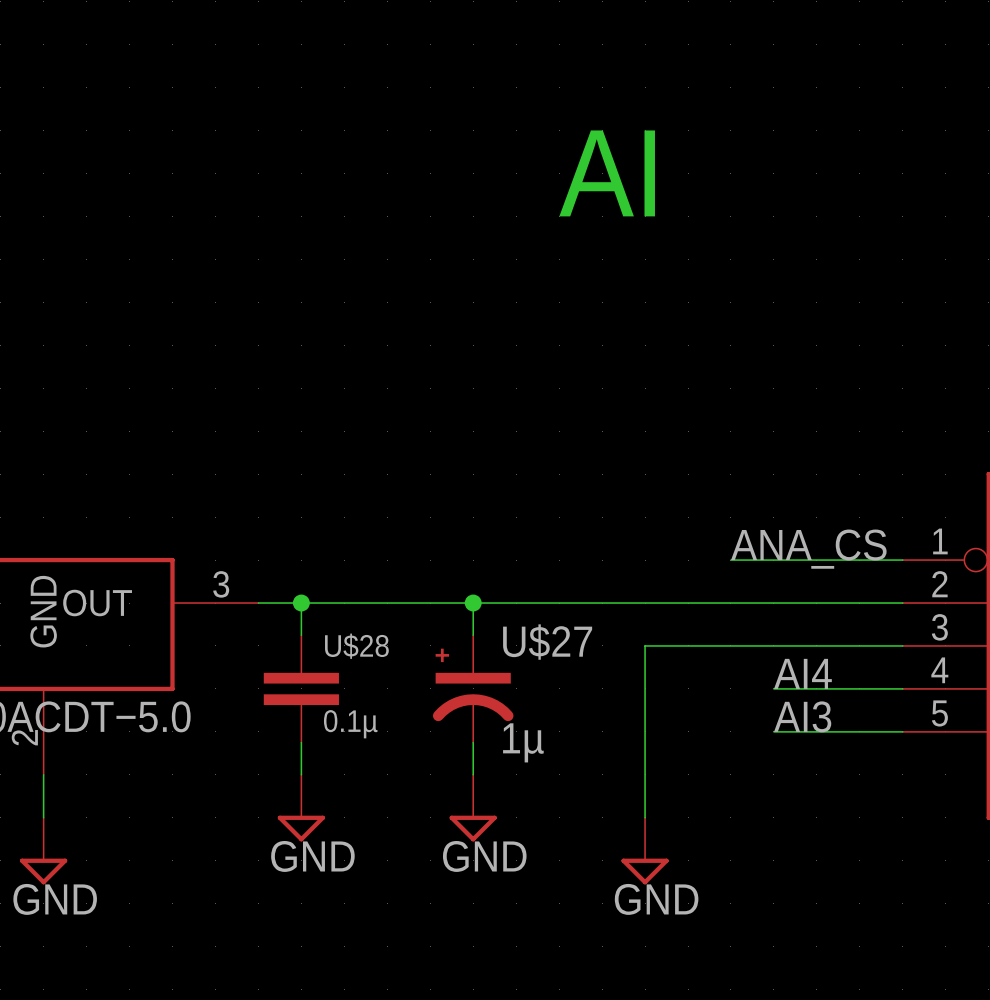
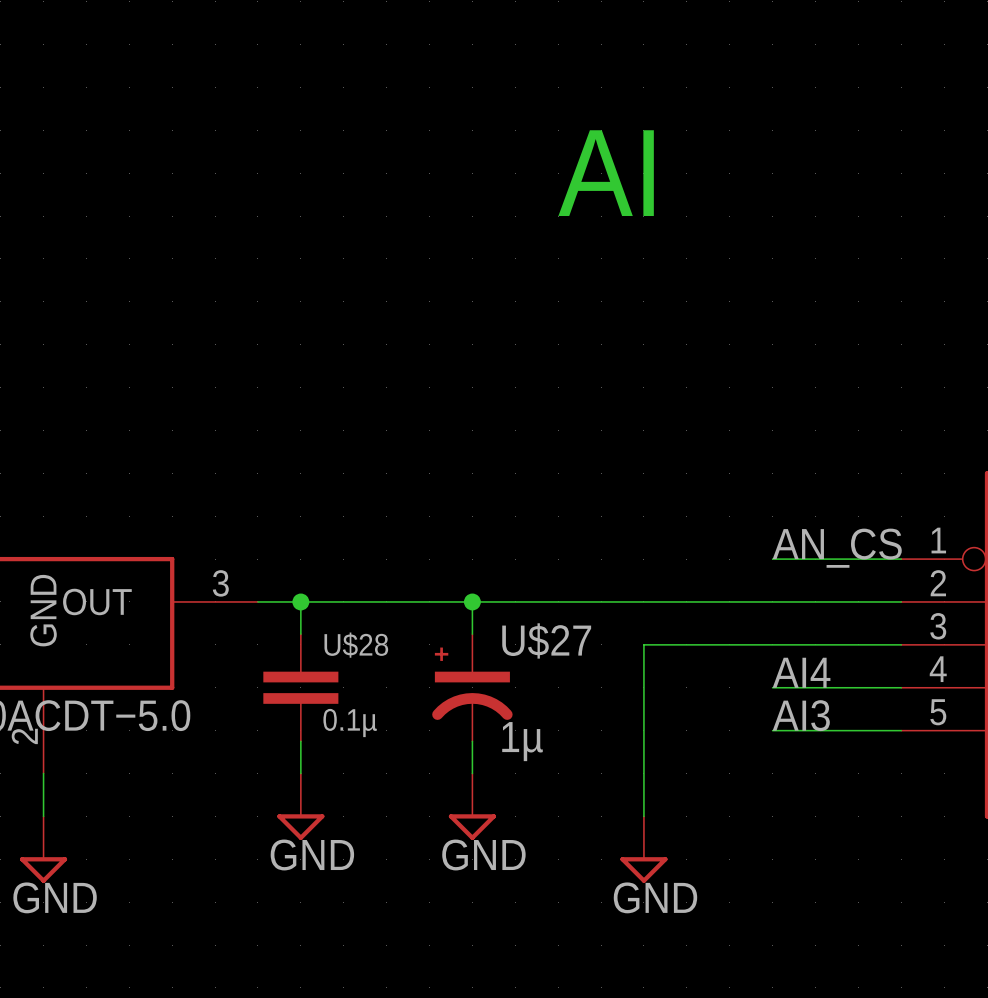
label: ANA_CS (808, 549) -> AN_CS (837, 548)
wire: (730, 560) (773, 560) -> none

